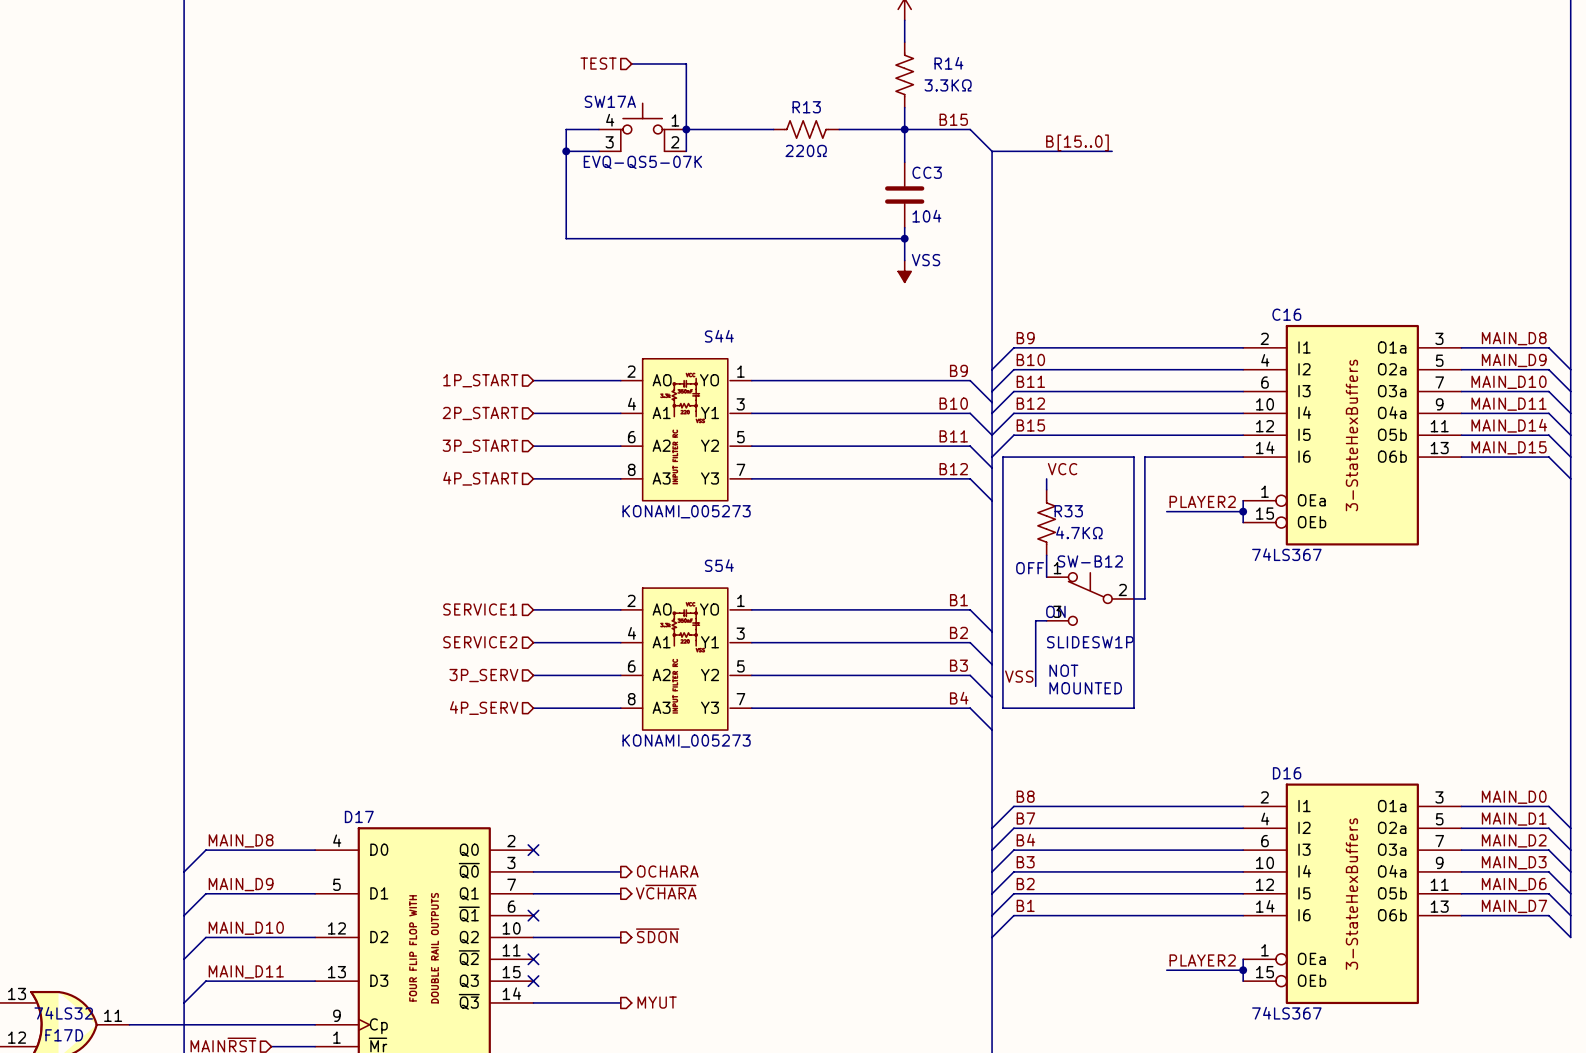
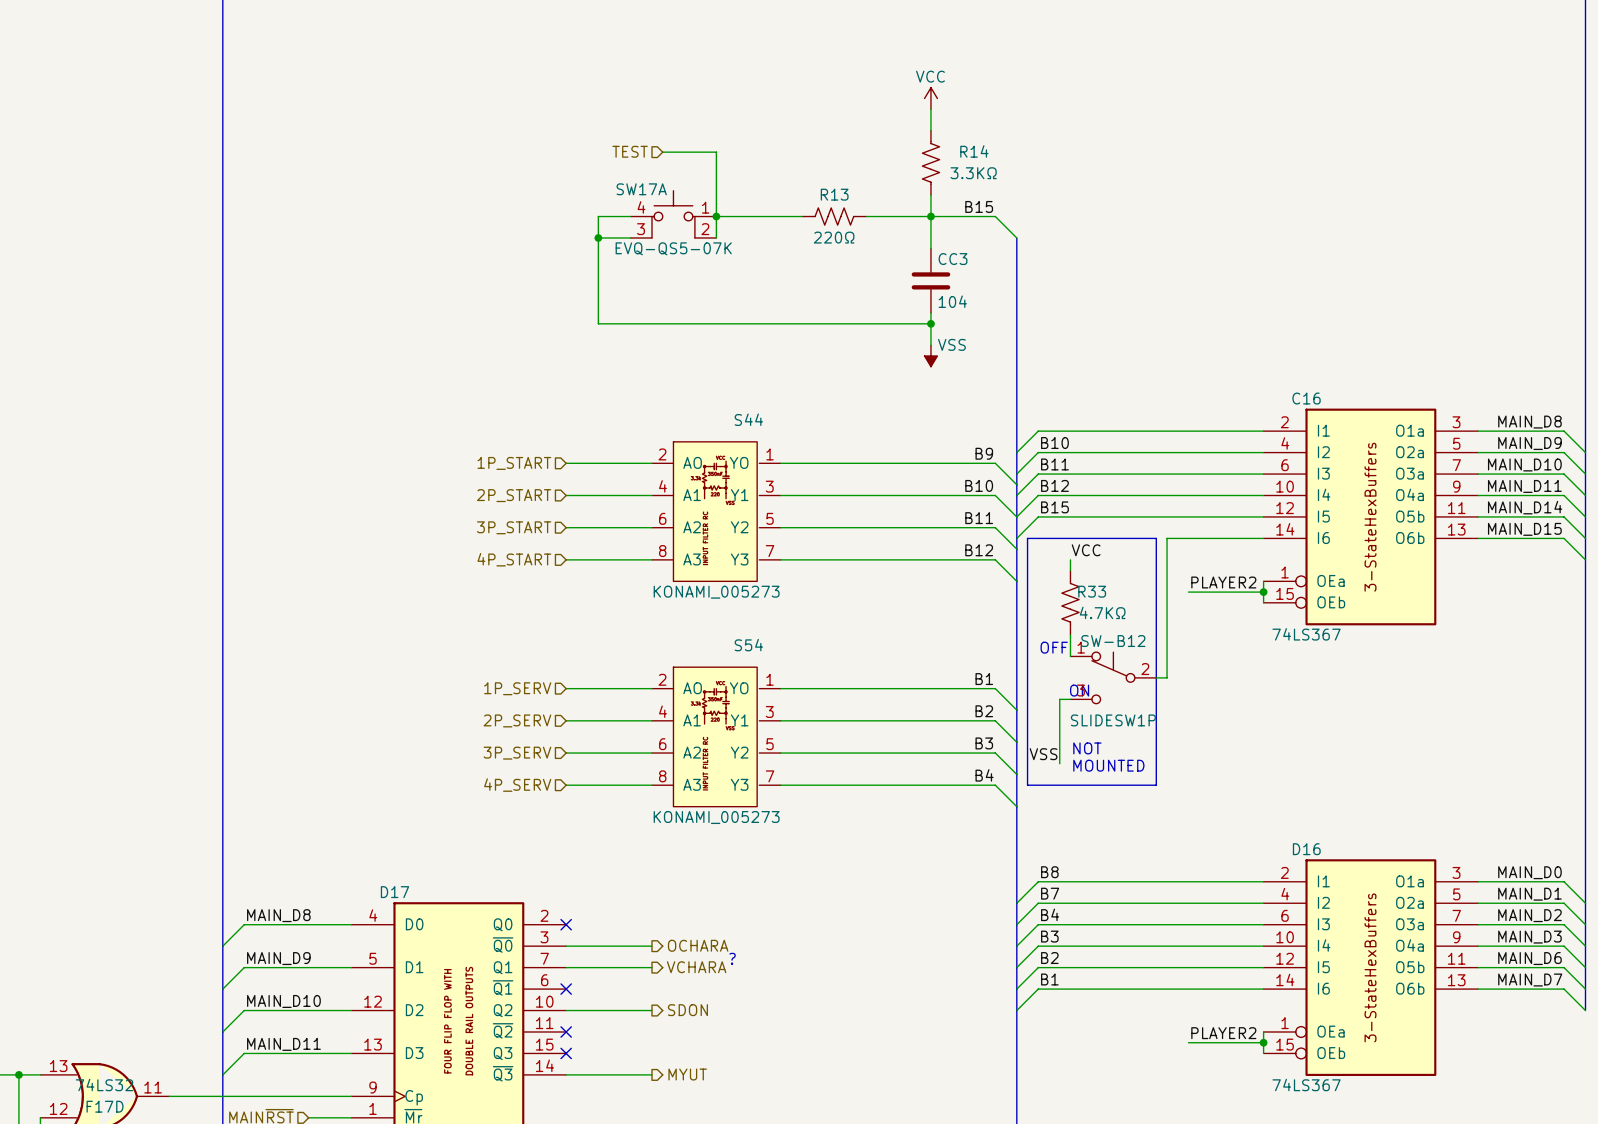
label: B[15..0] (1077, 142) -> none
bus: (992, 151) (1112, 151) -> none
label: B9 (1025, 338) -> none
hierarchical label: SERVICE1 (480, 609) -> 1P_SERV (517, 688)
hierarchical label: SERVICE2 (480, 642) -> 2P_SERV (517, 720)
text: none -> ? (732, 958)
hierarchical label: V~{CHARA} (666, 892) -> VCHARA (696, 967)
hierarchical label: ~{SDON} (657, 935) -> SDON (687, 1010)

